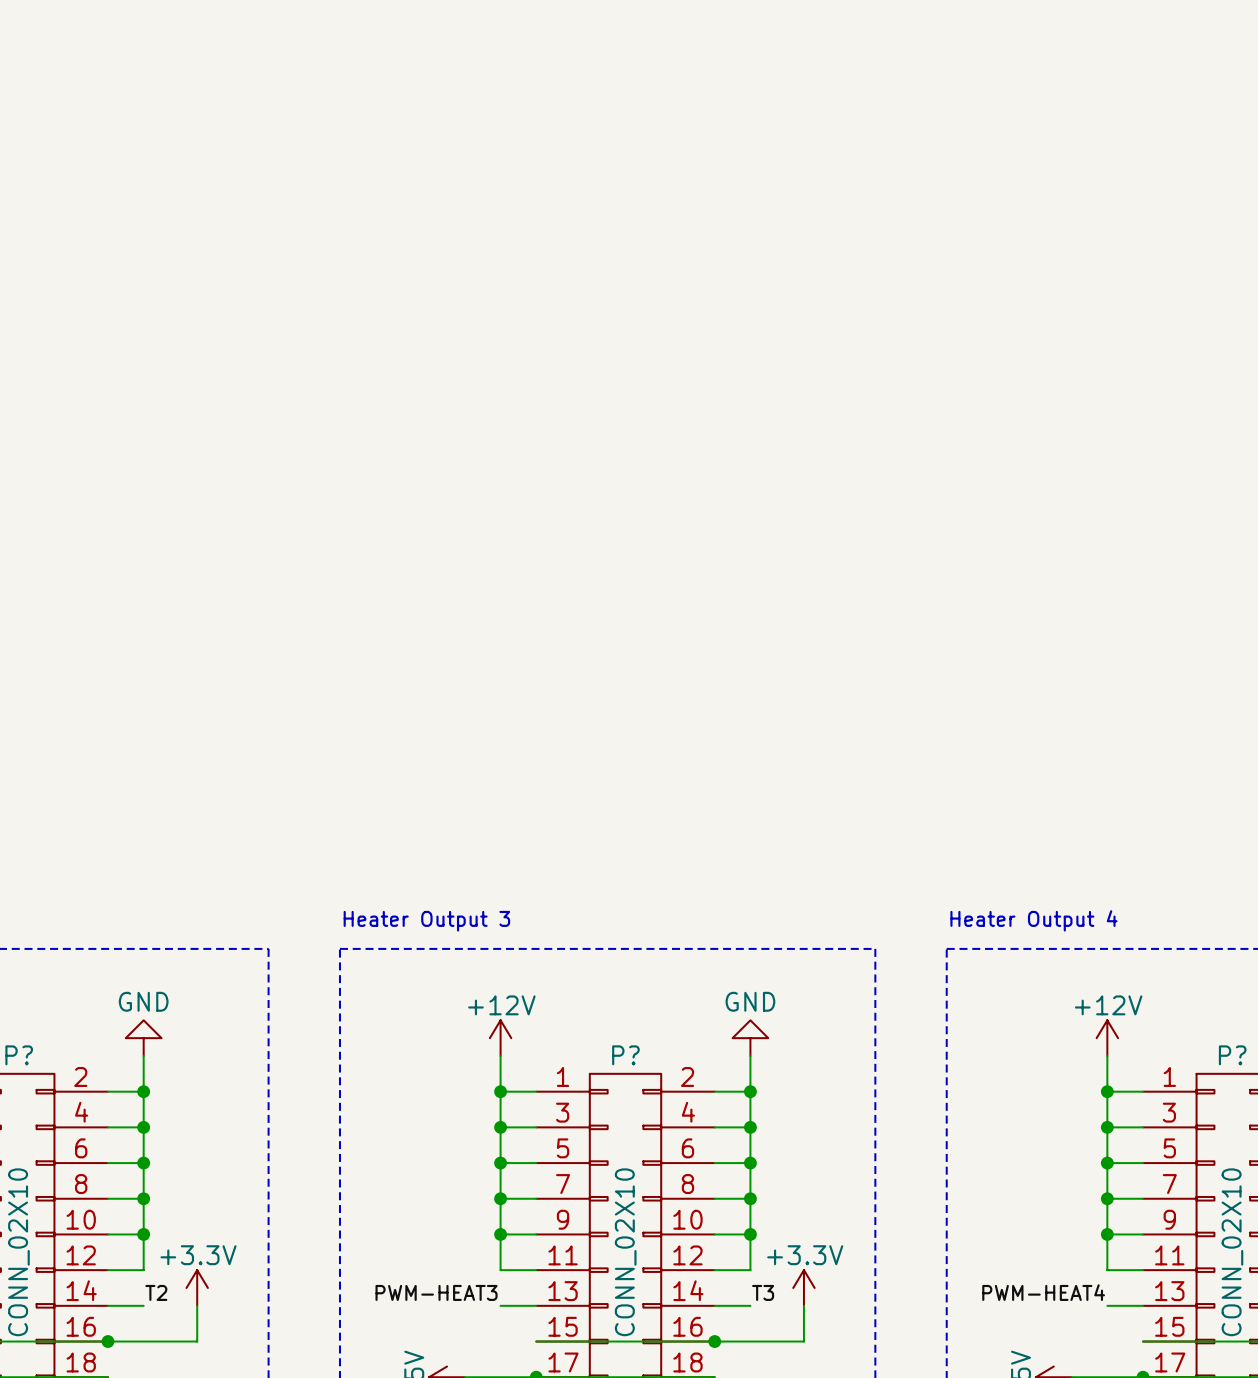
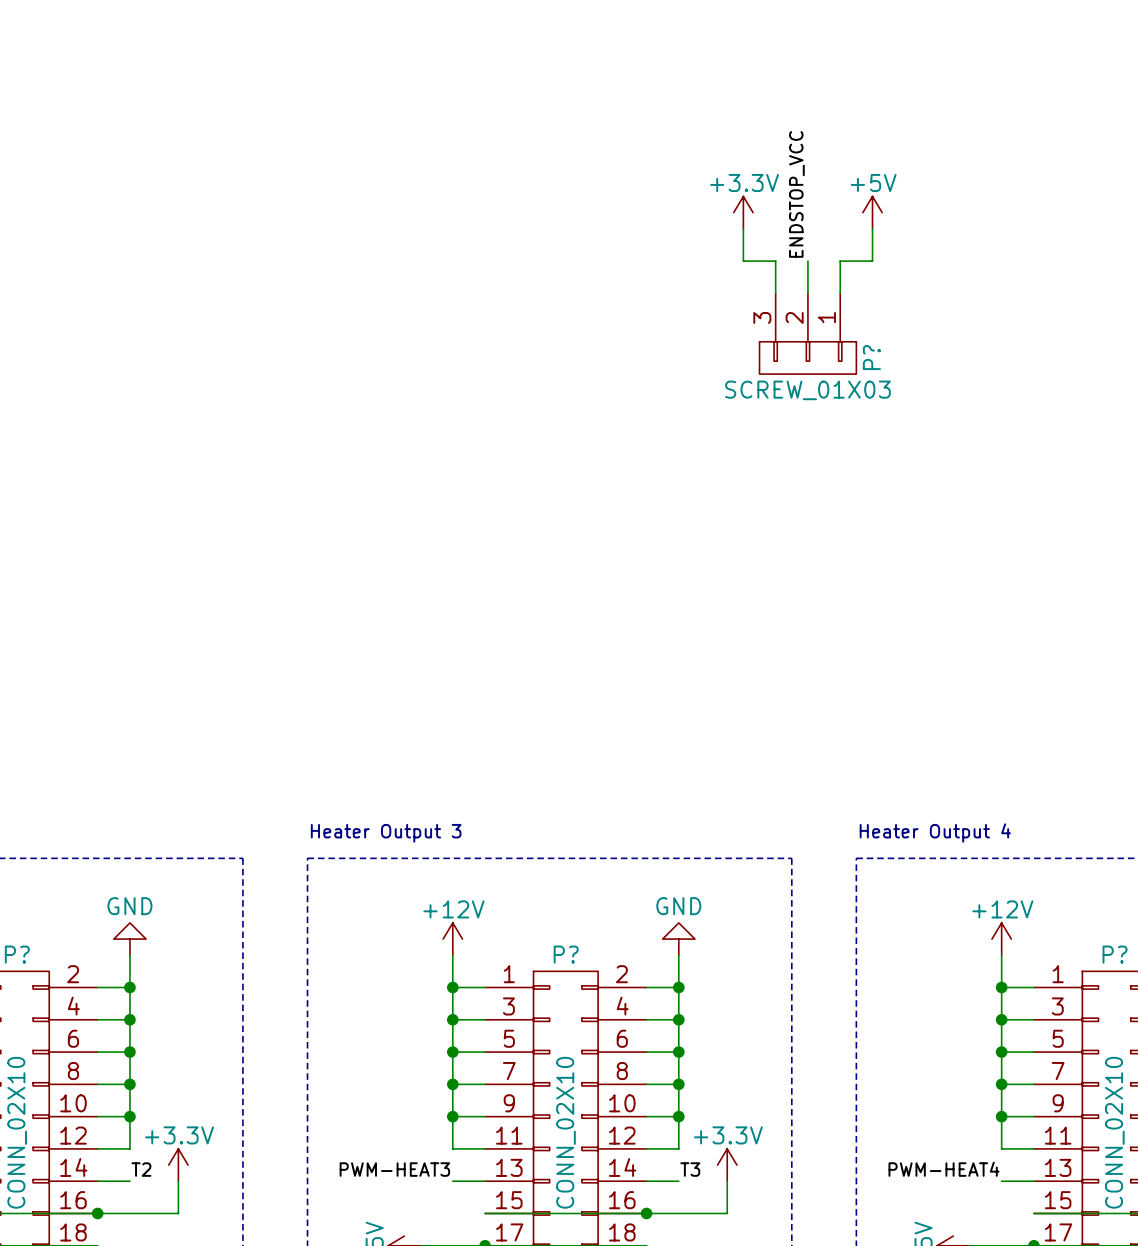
label: none -> ENDSTOP_VCC (796, 194)
power symbol: none -> +3.3V (743, 212)
power symbol: none -> +5V (872, 212)
wire: none -> (743, 228) (743, 261) (775, 261) (775, 293)
wire: none -> (872, 228) (872, 261) (840, 261) (840, 293)
wire: none -> (807, 261) (807, 293)
P?: none -> SCREW_01X03 (807, 333)

